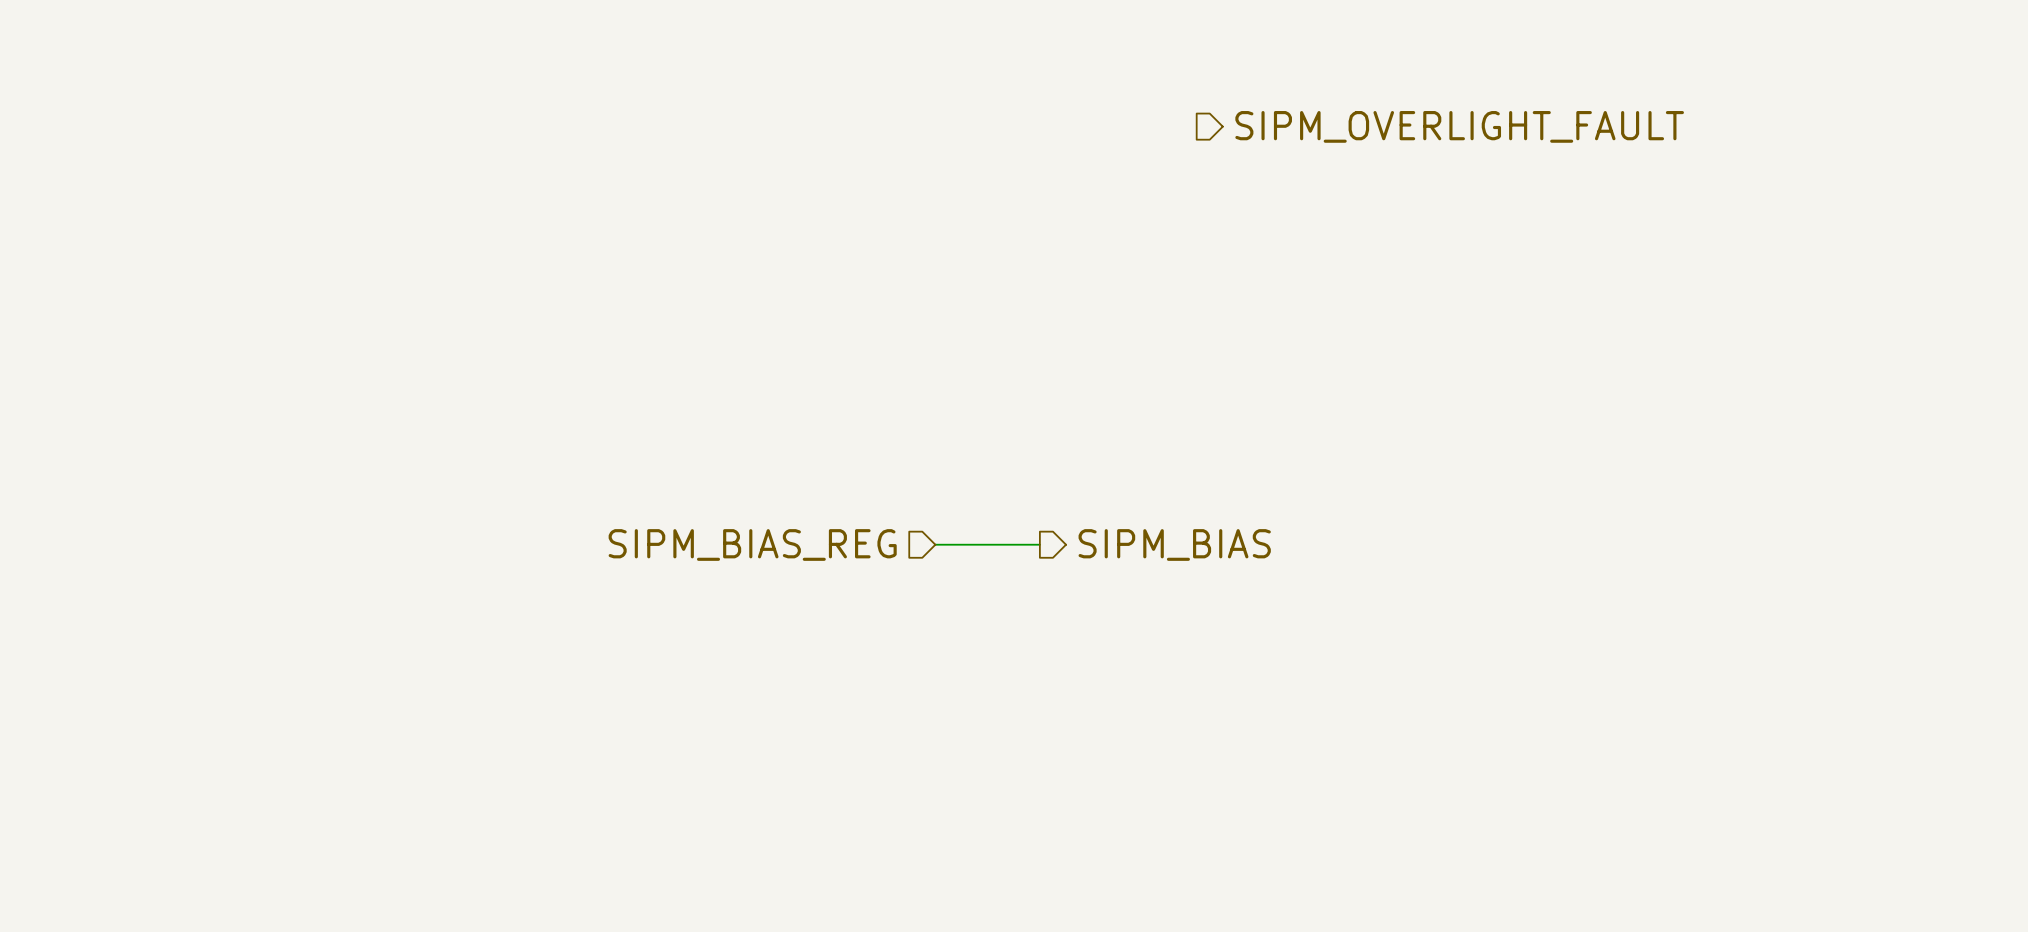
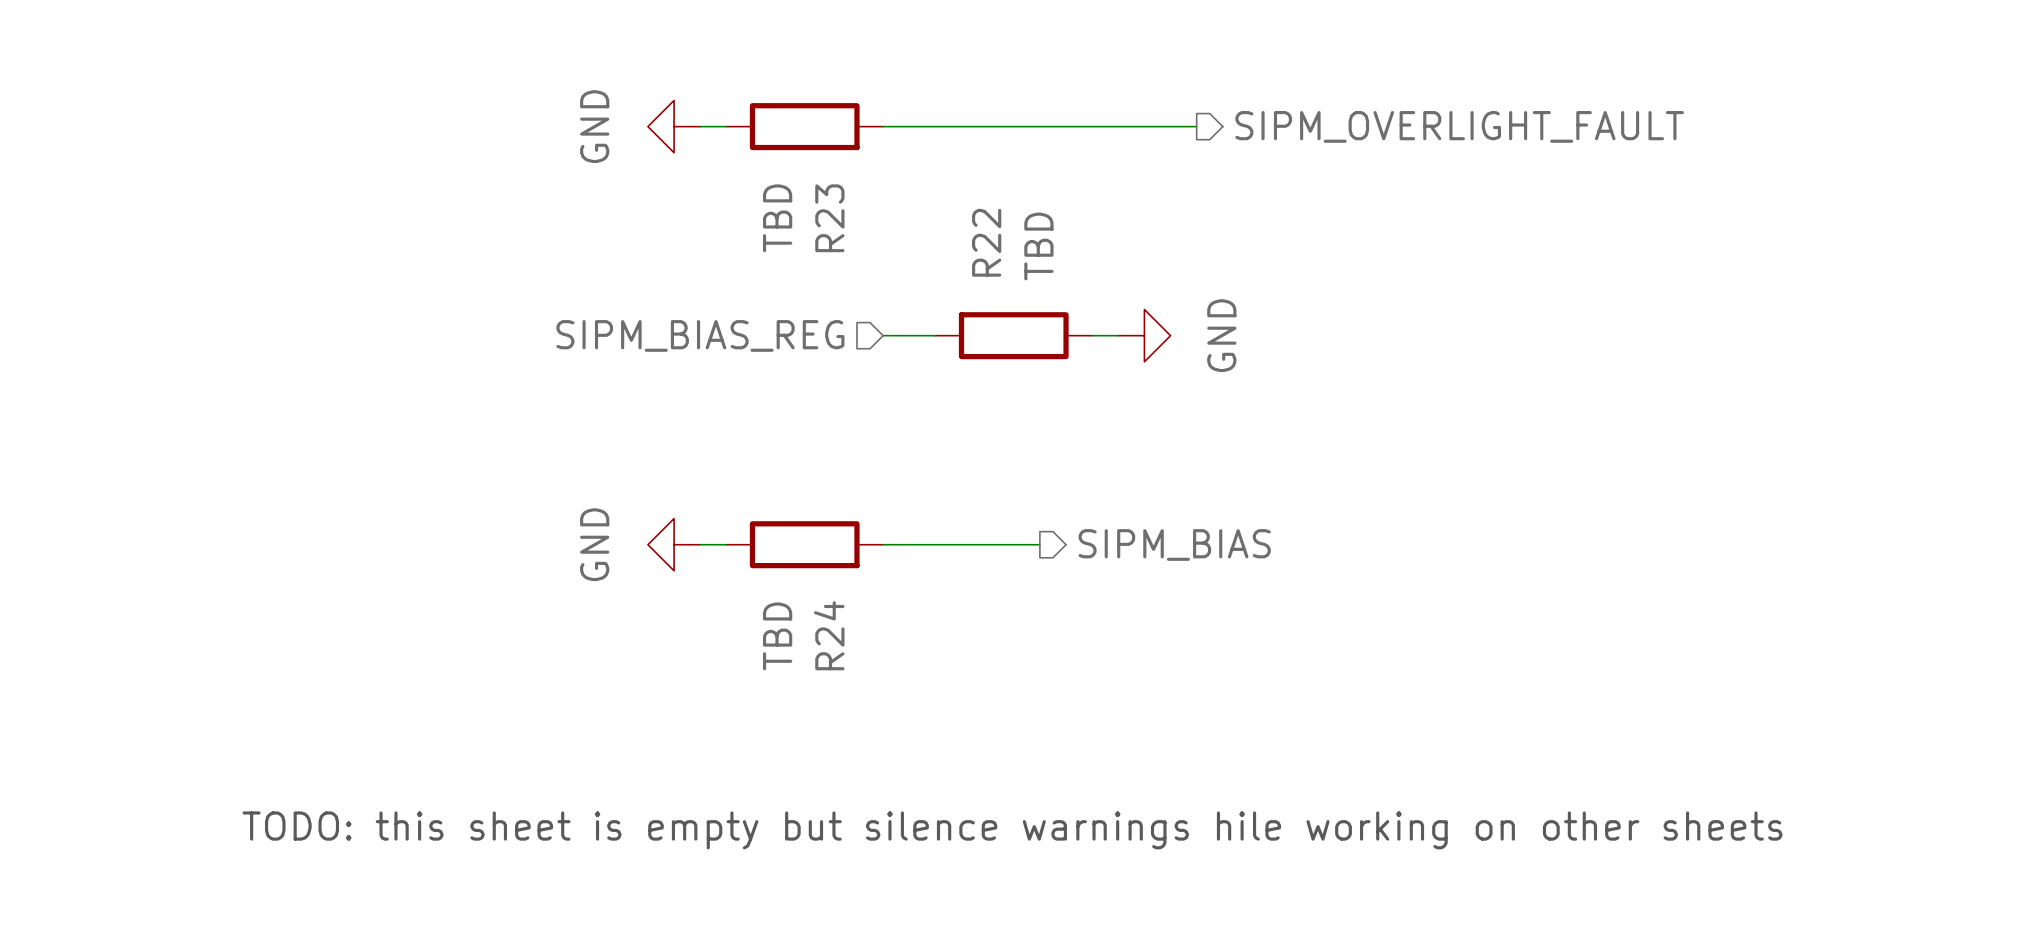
power symbol: none -> GND (674, 126)
wire: none -> (700, 126) (726, 126)
R23: none -> TBD (804, 126)
wire: none -> (883, 126) (1196, 126)
wire: none -> (883, 335) (935, 335)
R22: none -> TBD (1013, 335)
wire: none -> (1092, 335) (1118, 335)
power symbol: none -> GND (1144, 335)
power symbol: none -> GND (674, 544)
wire: none -> (700, 544) (726, 544)
hierarchical label position: SIPM_BIAS_REG (752, 544) -> SIPM_BIAS_REG (700, 335)
R24: none -> TBD (804, 544)
wire: none -> (883, 544) (935, 544)
text: none -> TODO: this sheet is empty but silence warnings hile working on other sheets (1012, 830)

